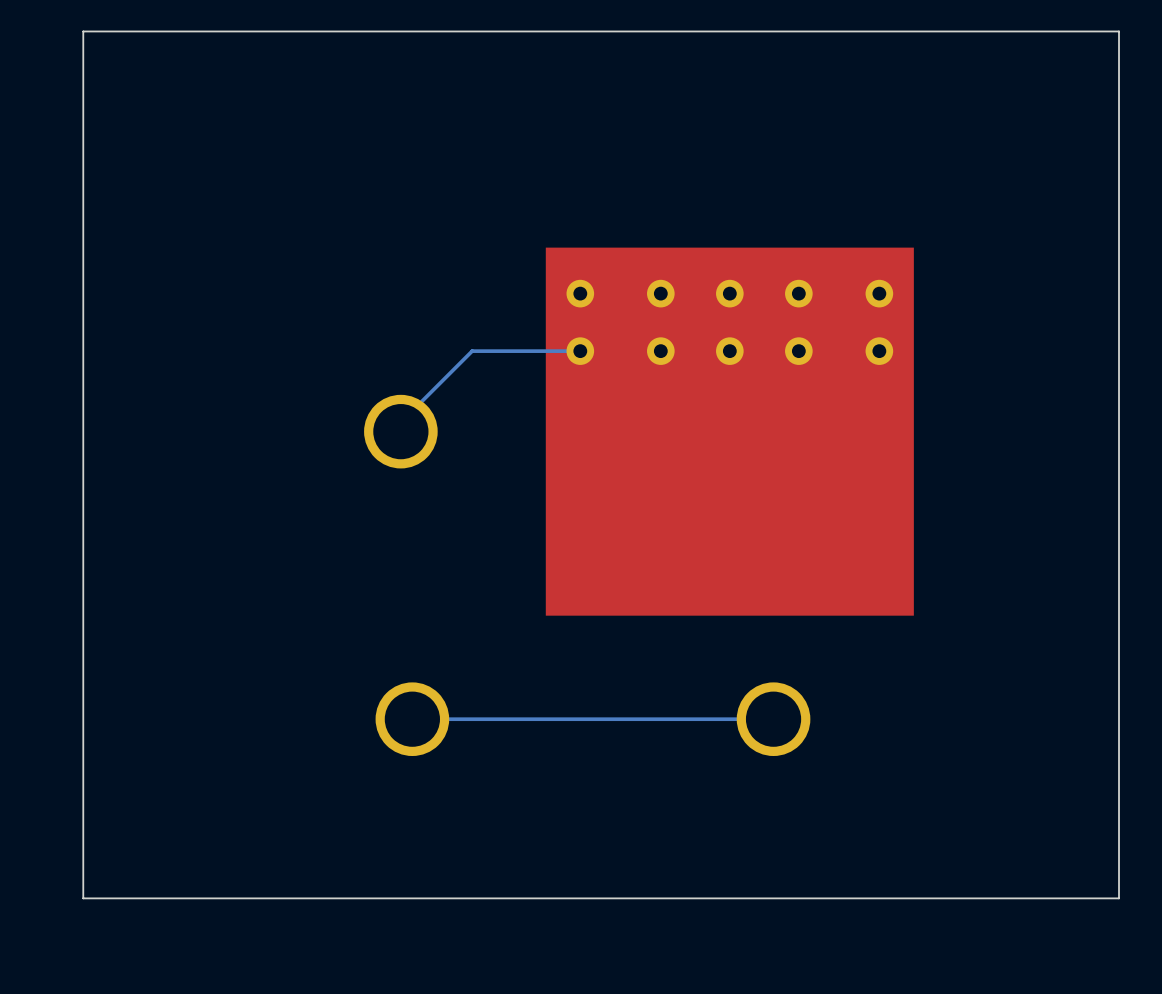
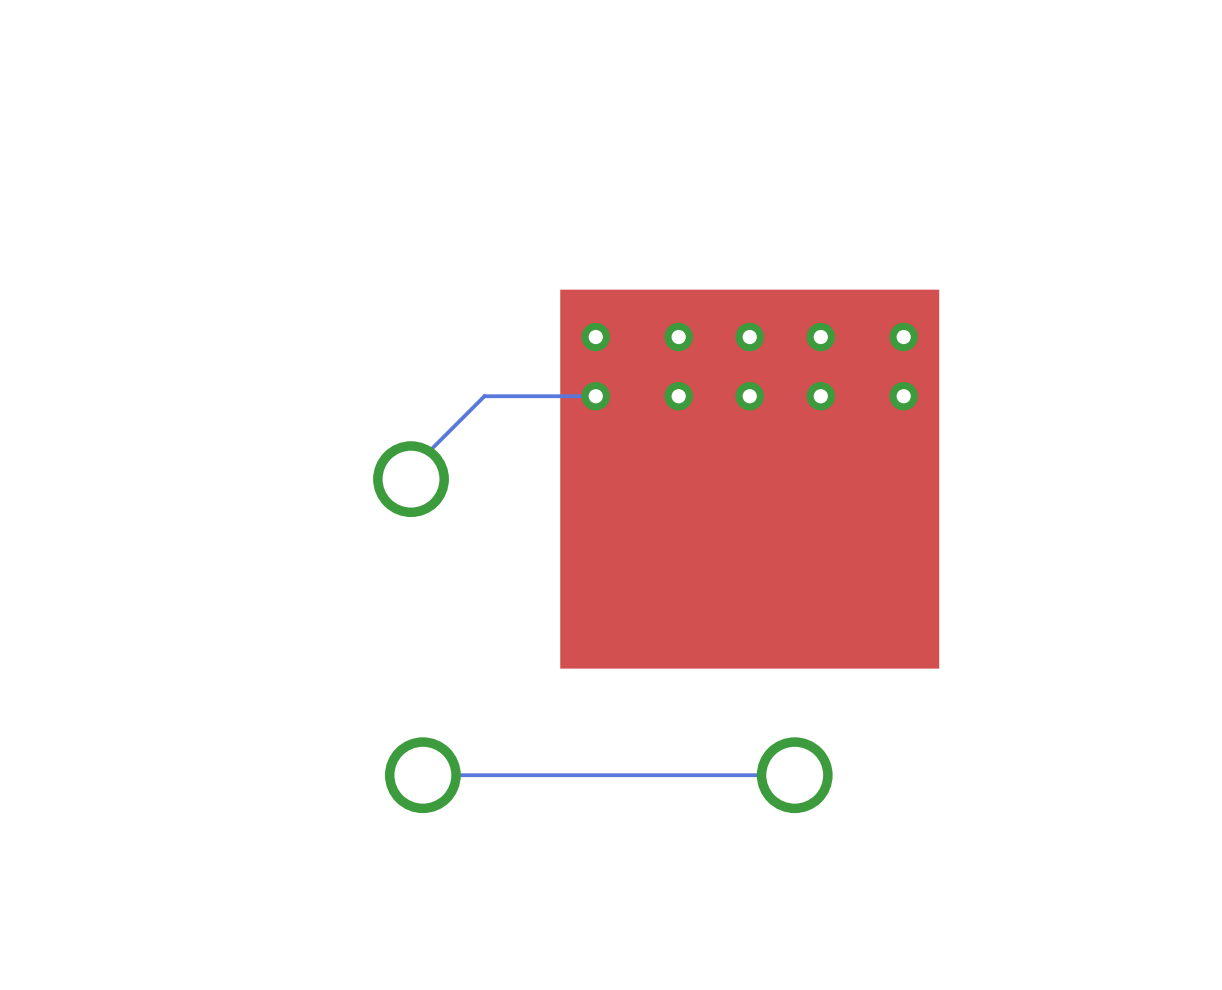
board edge: (1119, 31) (83, 31) (83, 898) (1119, 898) (1119, 31) -> none

